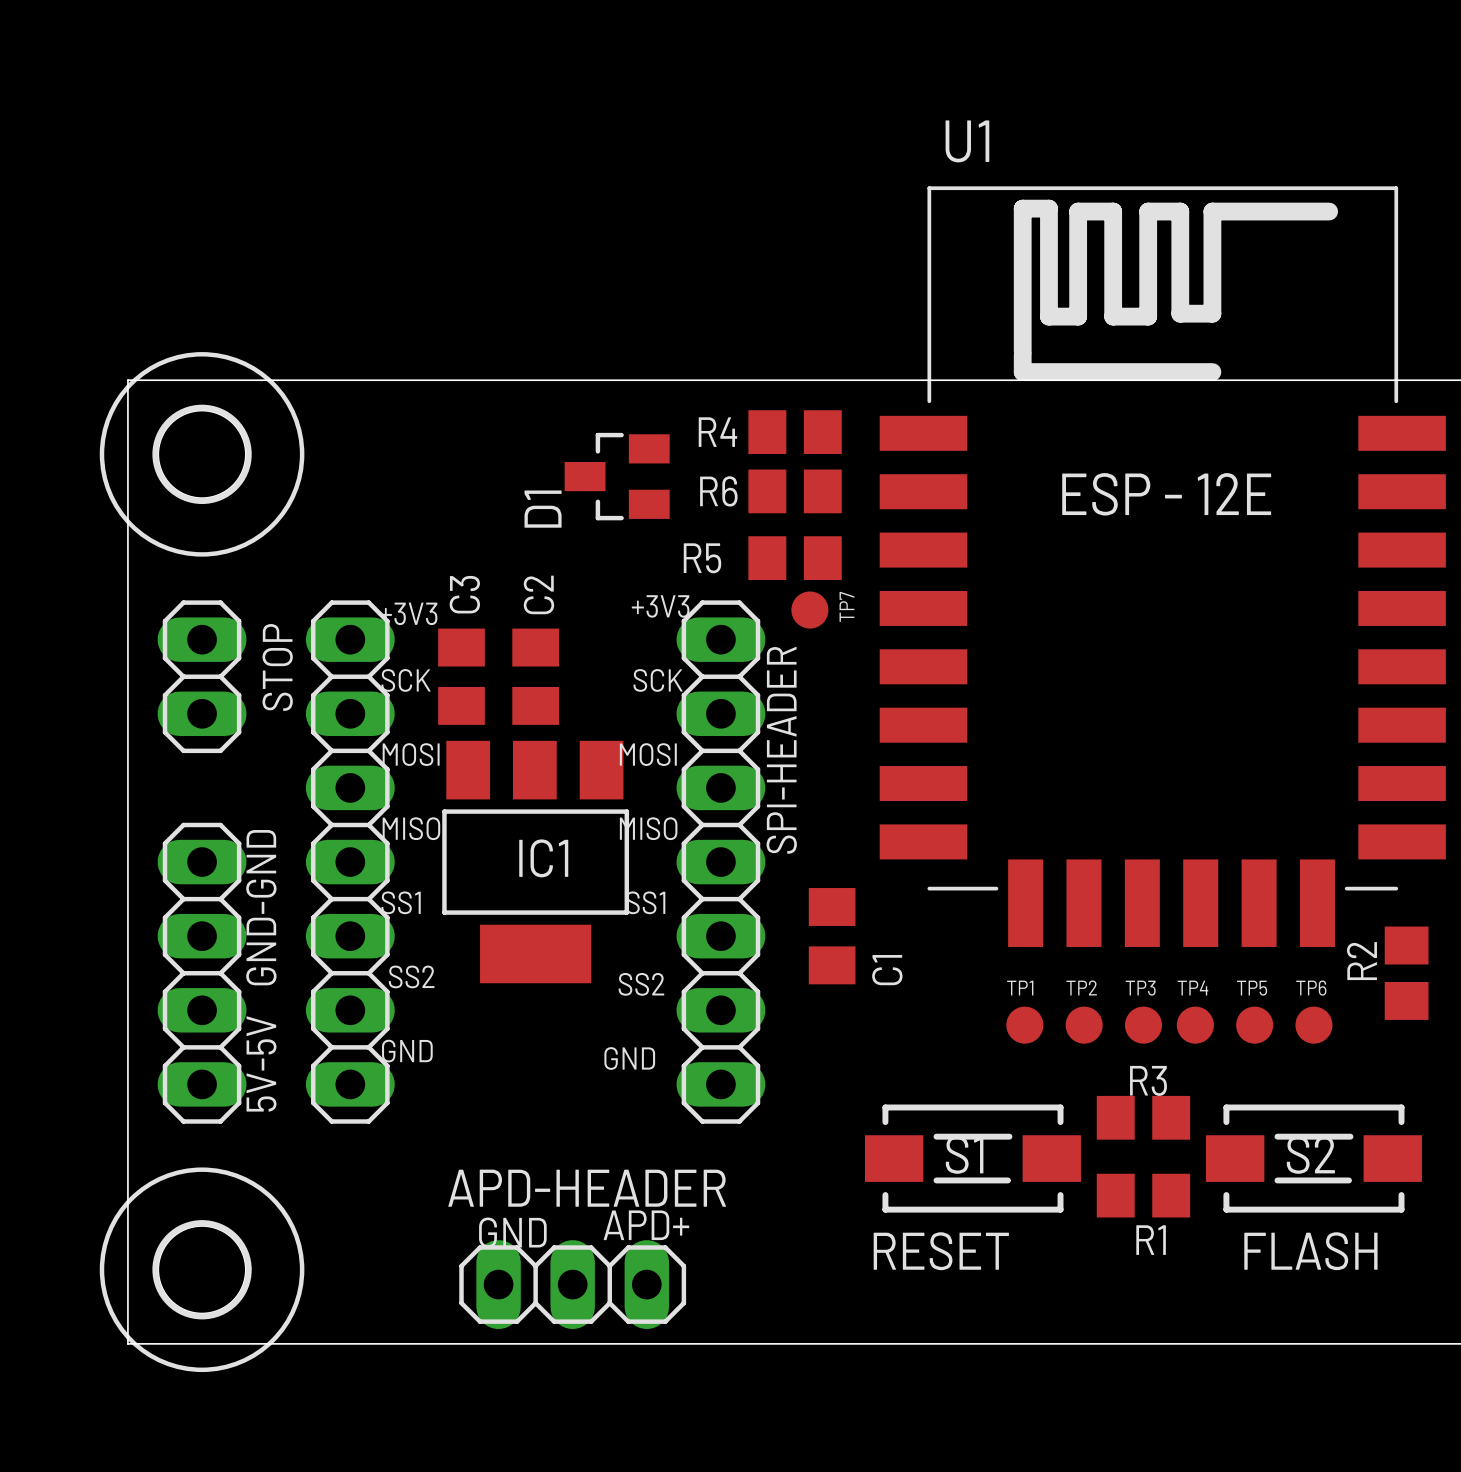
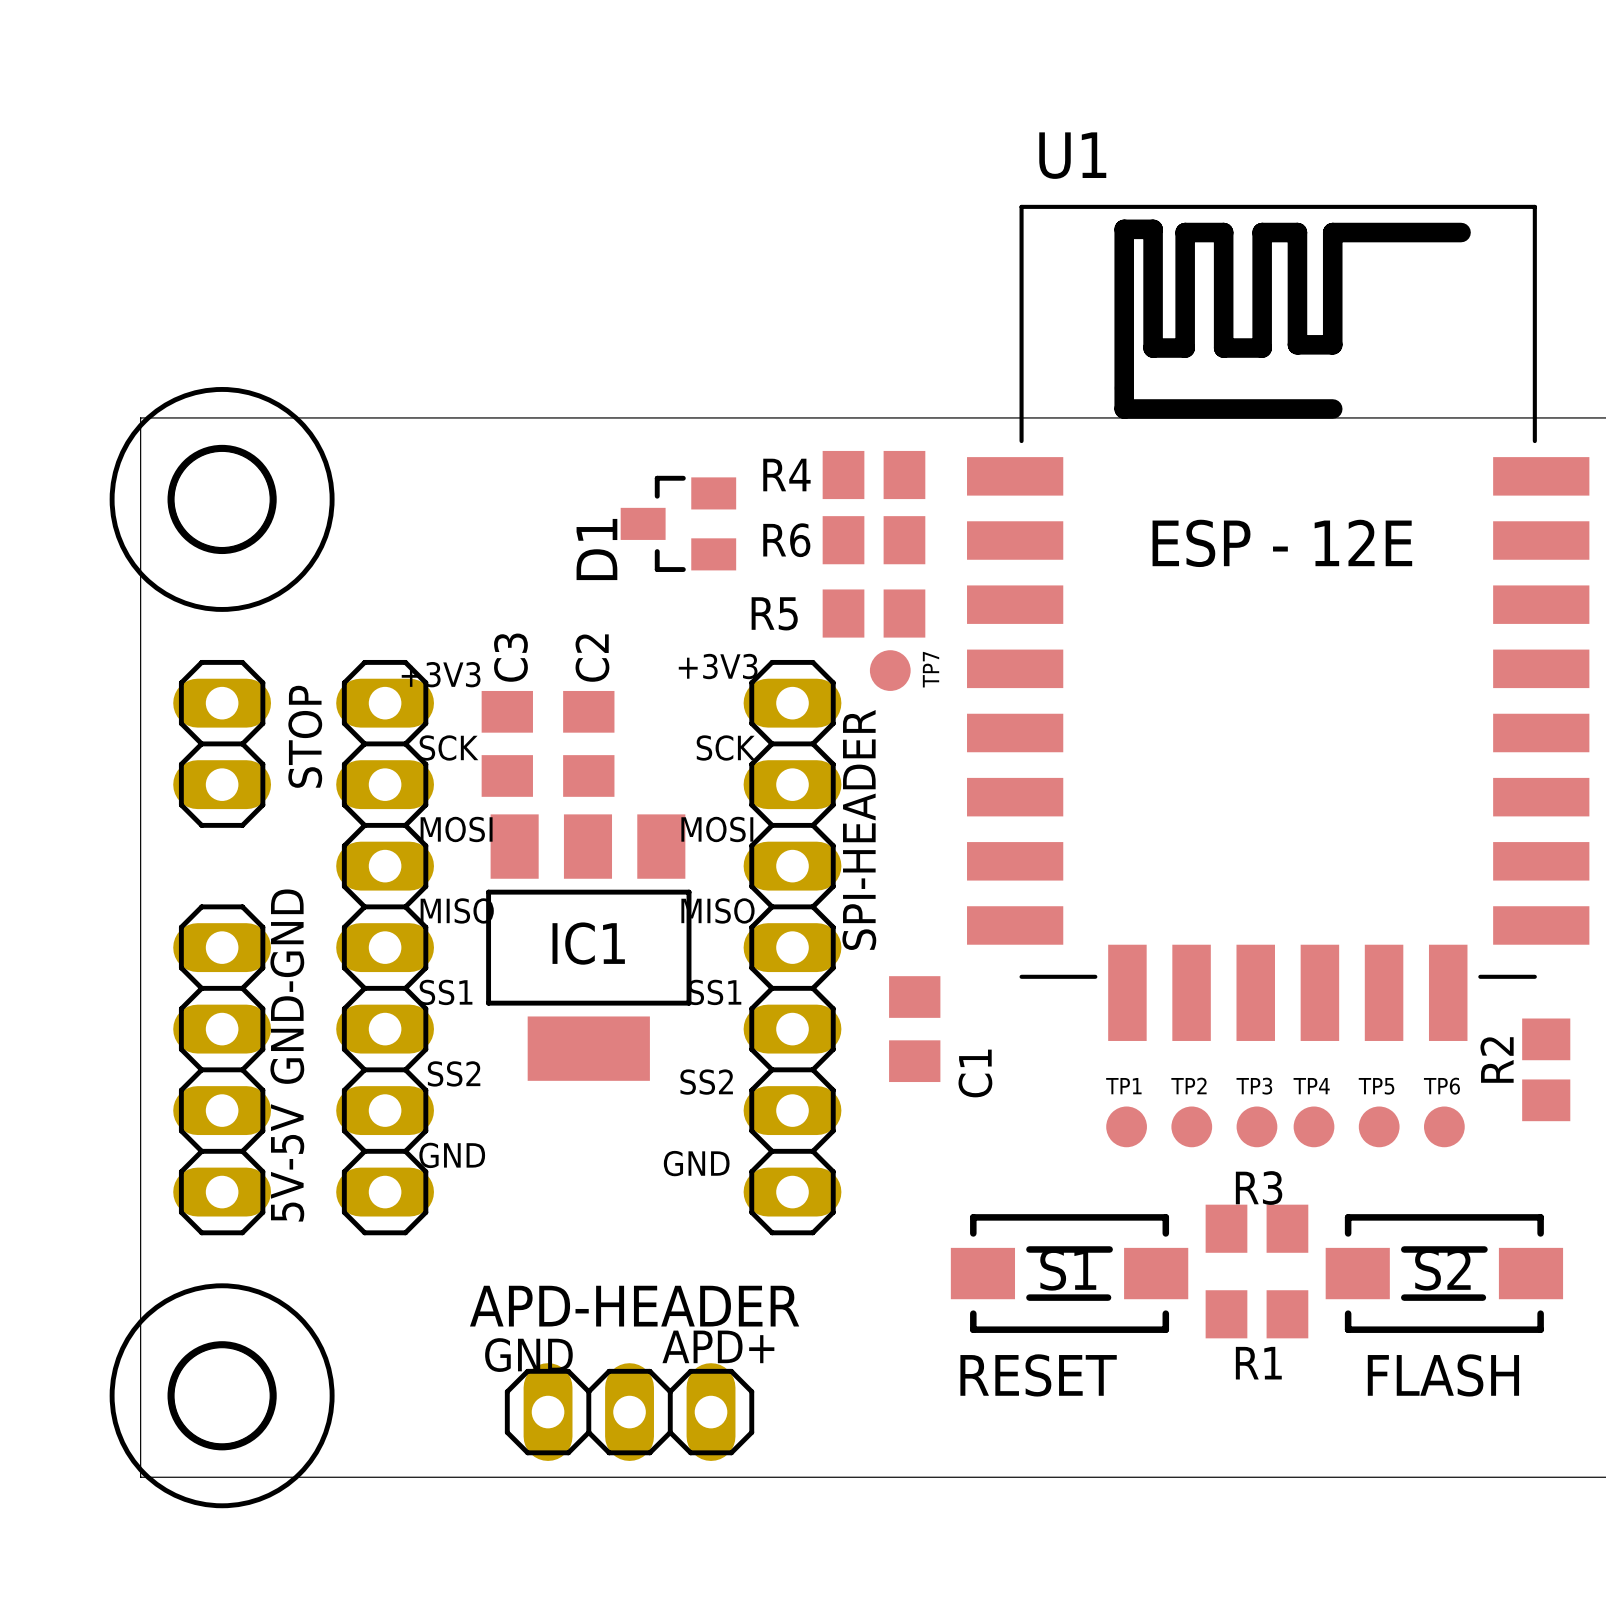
text position: GND (512, 1232) -> GND (528, 1355)

